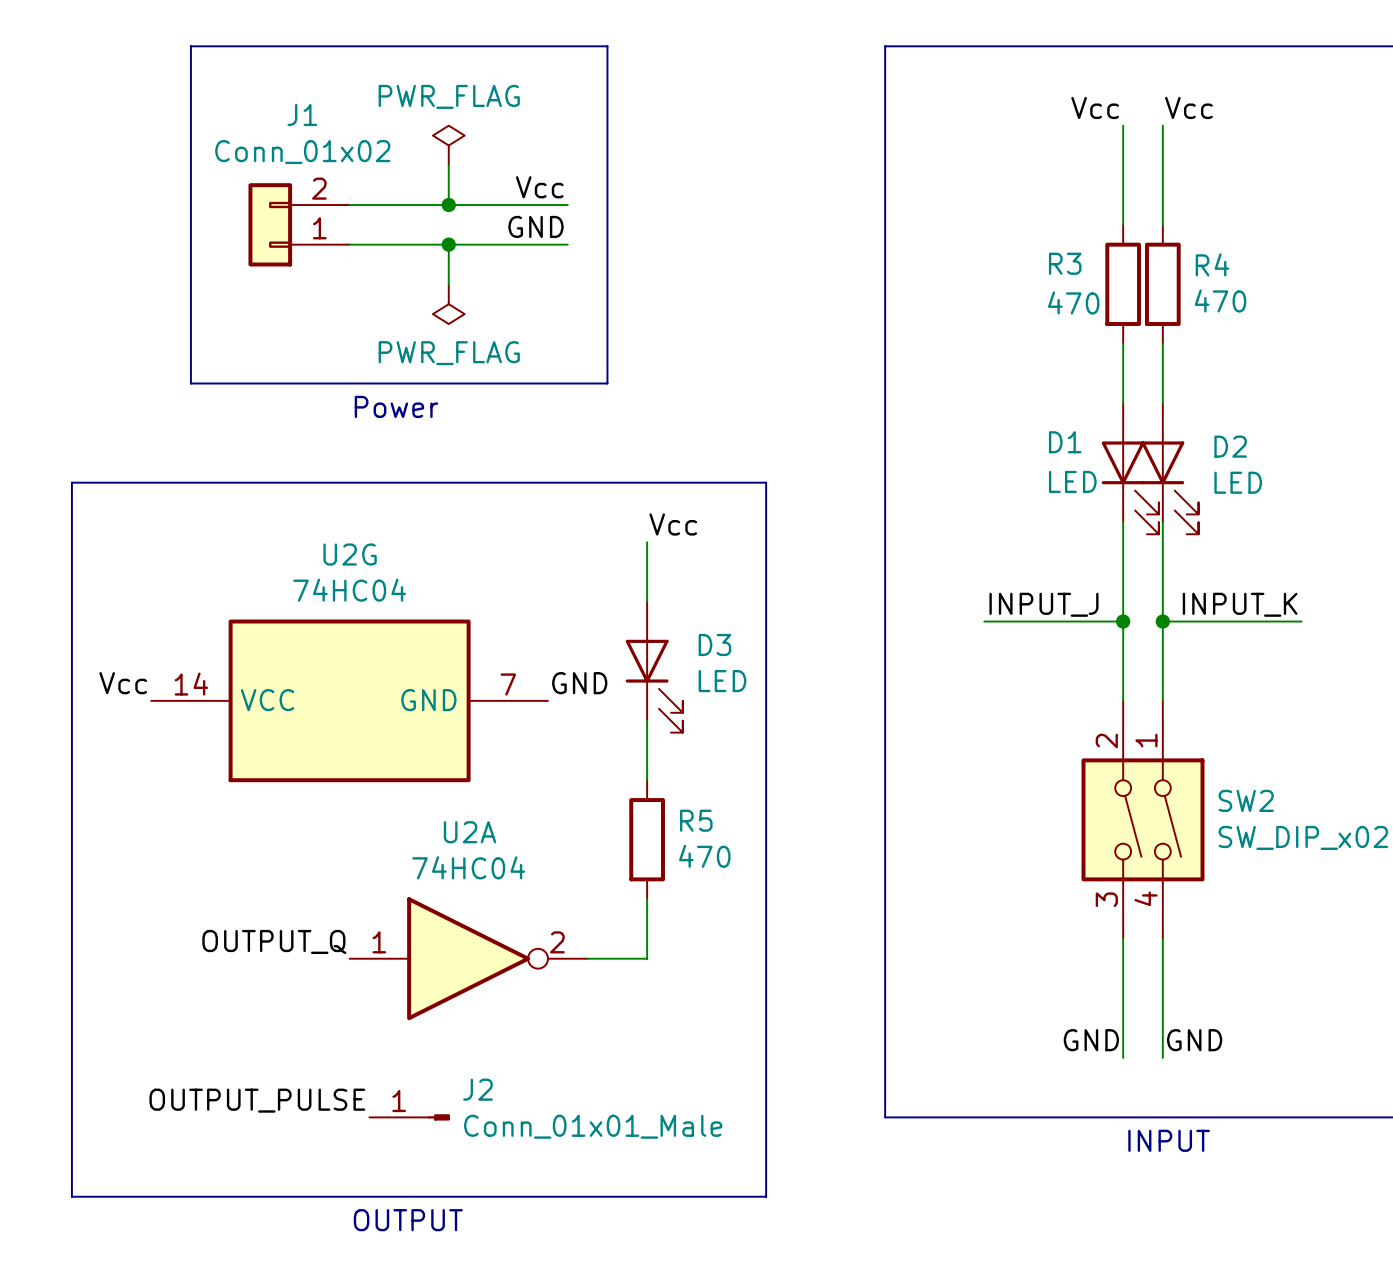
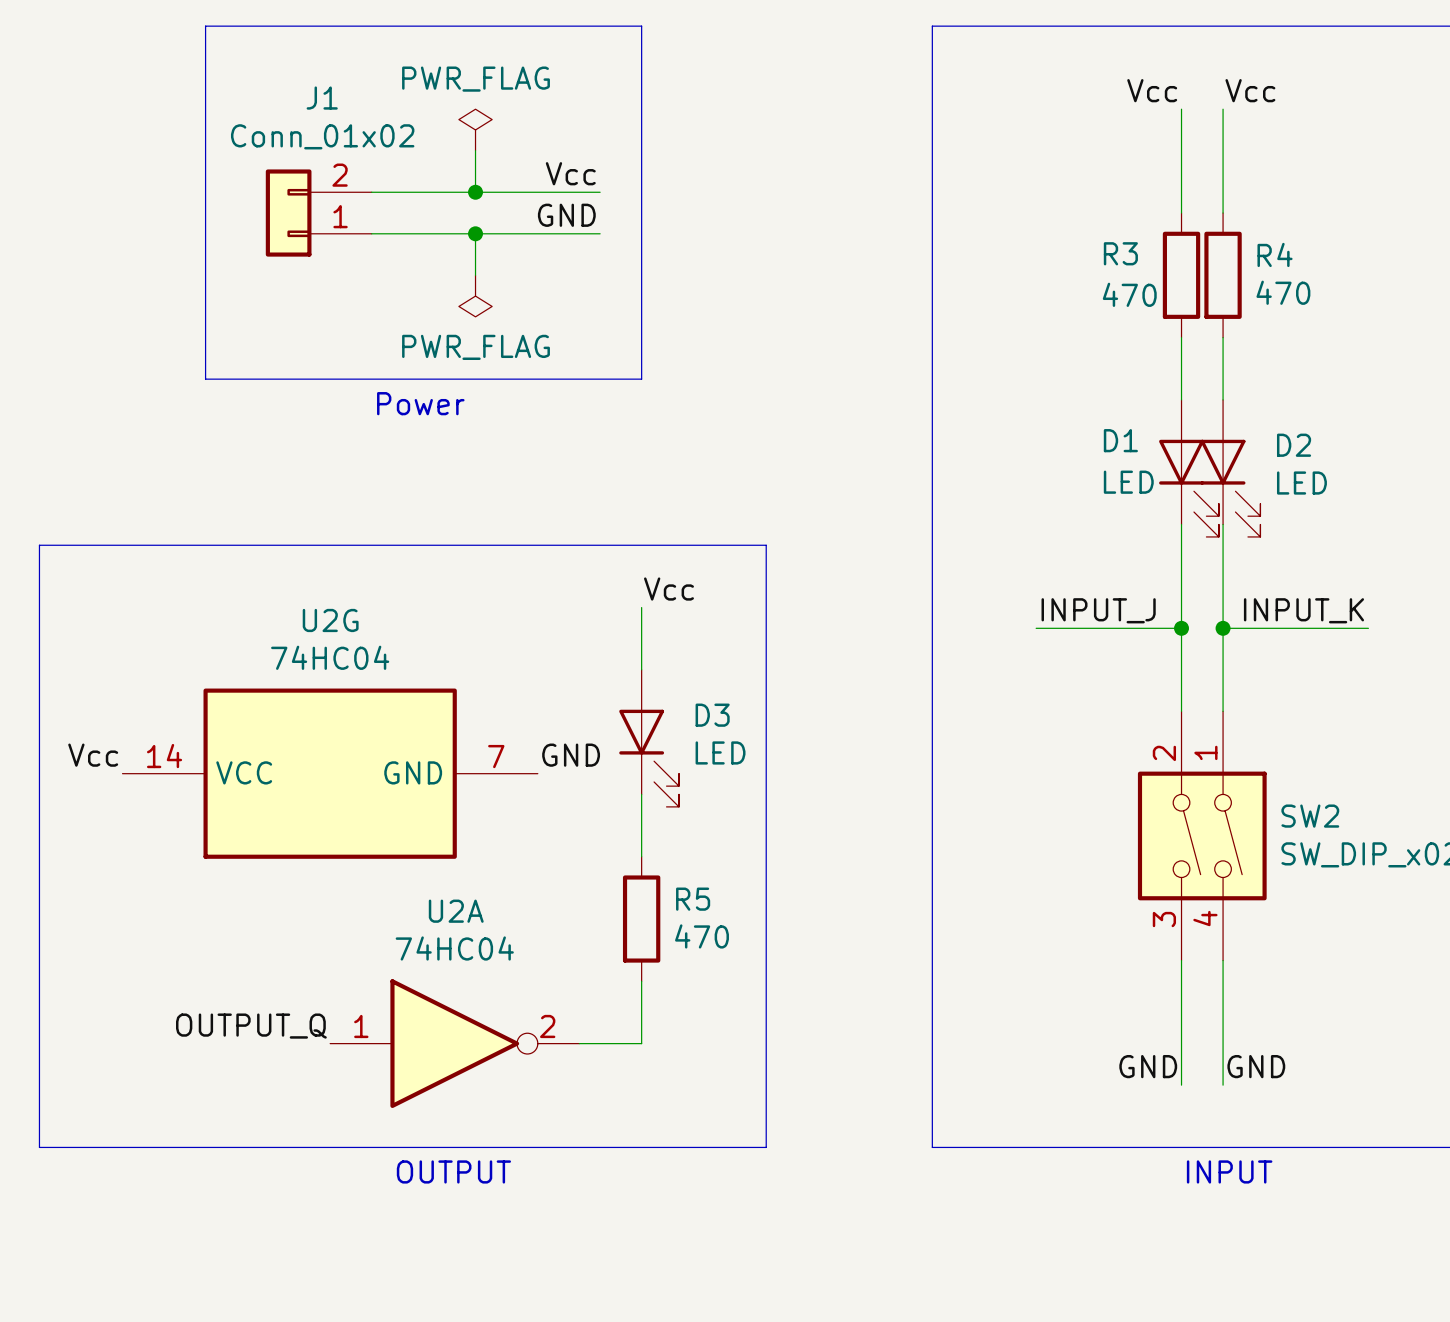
bus: (71, 482) (71, 1196) (766, 1196) (766, 482) (71, 482) -> (39, 545) (39, 1147) (766, 1147) (766, 545) (39, 545)
label position: Vcc (673, 524) -> Vcc (668, 589)
wire: (647, 542) (647, 601) -> (641, 607) (641, 669)
D3 position: (654, 667) -> (649, 738)
label position: Vcc (123, 683) -> Vcc (93, 755)
label position: GND (579, 683) -> GND (571, 755)
U2G position: (349, 700) -> (330, 773)
wire: (647, 720) (647, 780) -> (641, 794) (641, 856)
R5 position: (647, 839) -> (641, 919)
wire: (647, 899) (647, 958) (587, 958) -> (641, 981) (641, 1043) (579, 1043)
label position: OUTPUT_Q (274, 941) -> OUTPUT_Q (251, 1026)
U2A position: (468, 958) -> (454, 1043)
label: OUTPUT_PULSE (257, 1100) -> none
J2: Conn_01x01_Male (409, 1117) -> none
text position: OUTPUT (408, 1220) -> OUTPUT (453, 1171)

